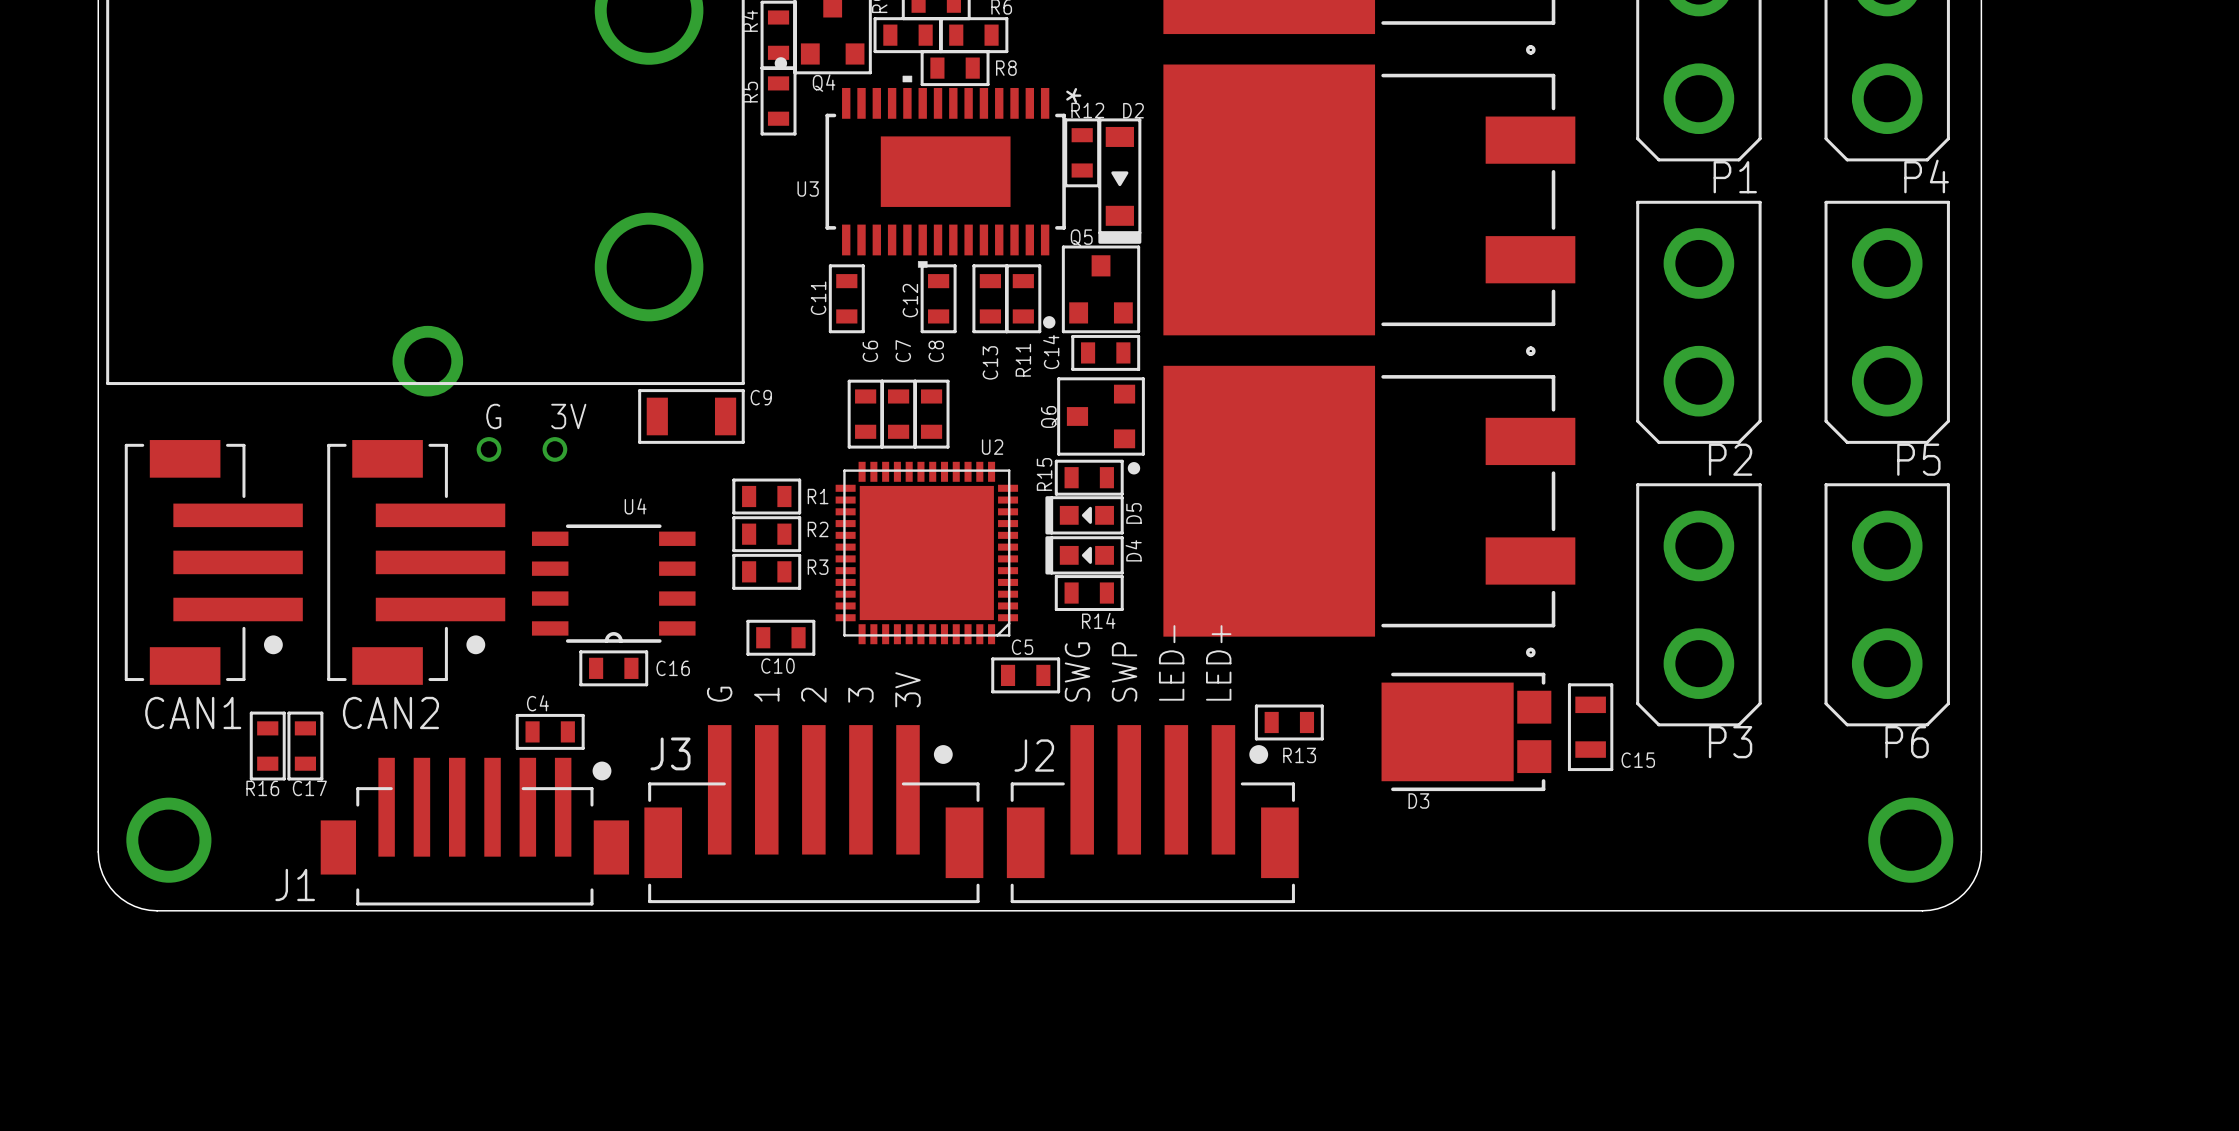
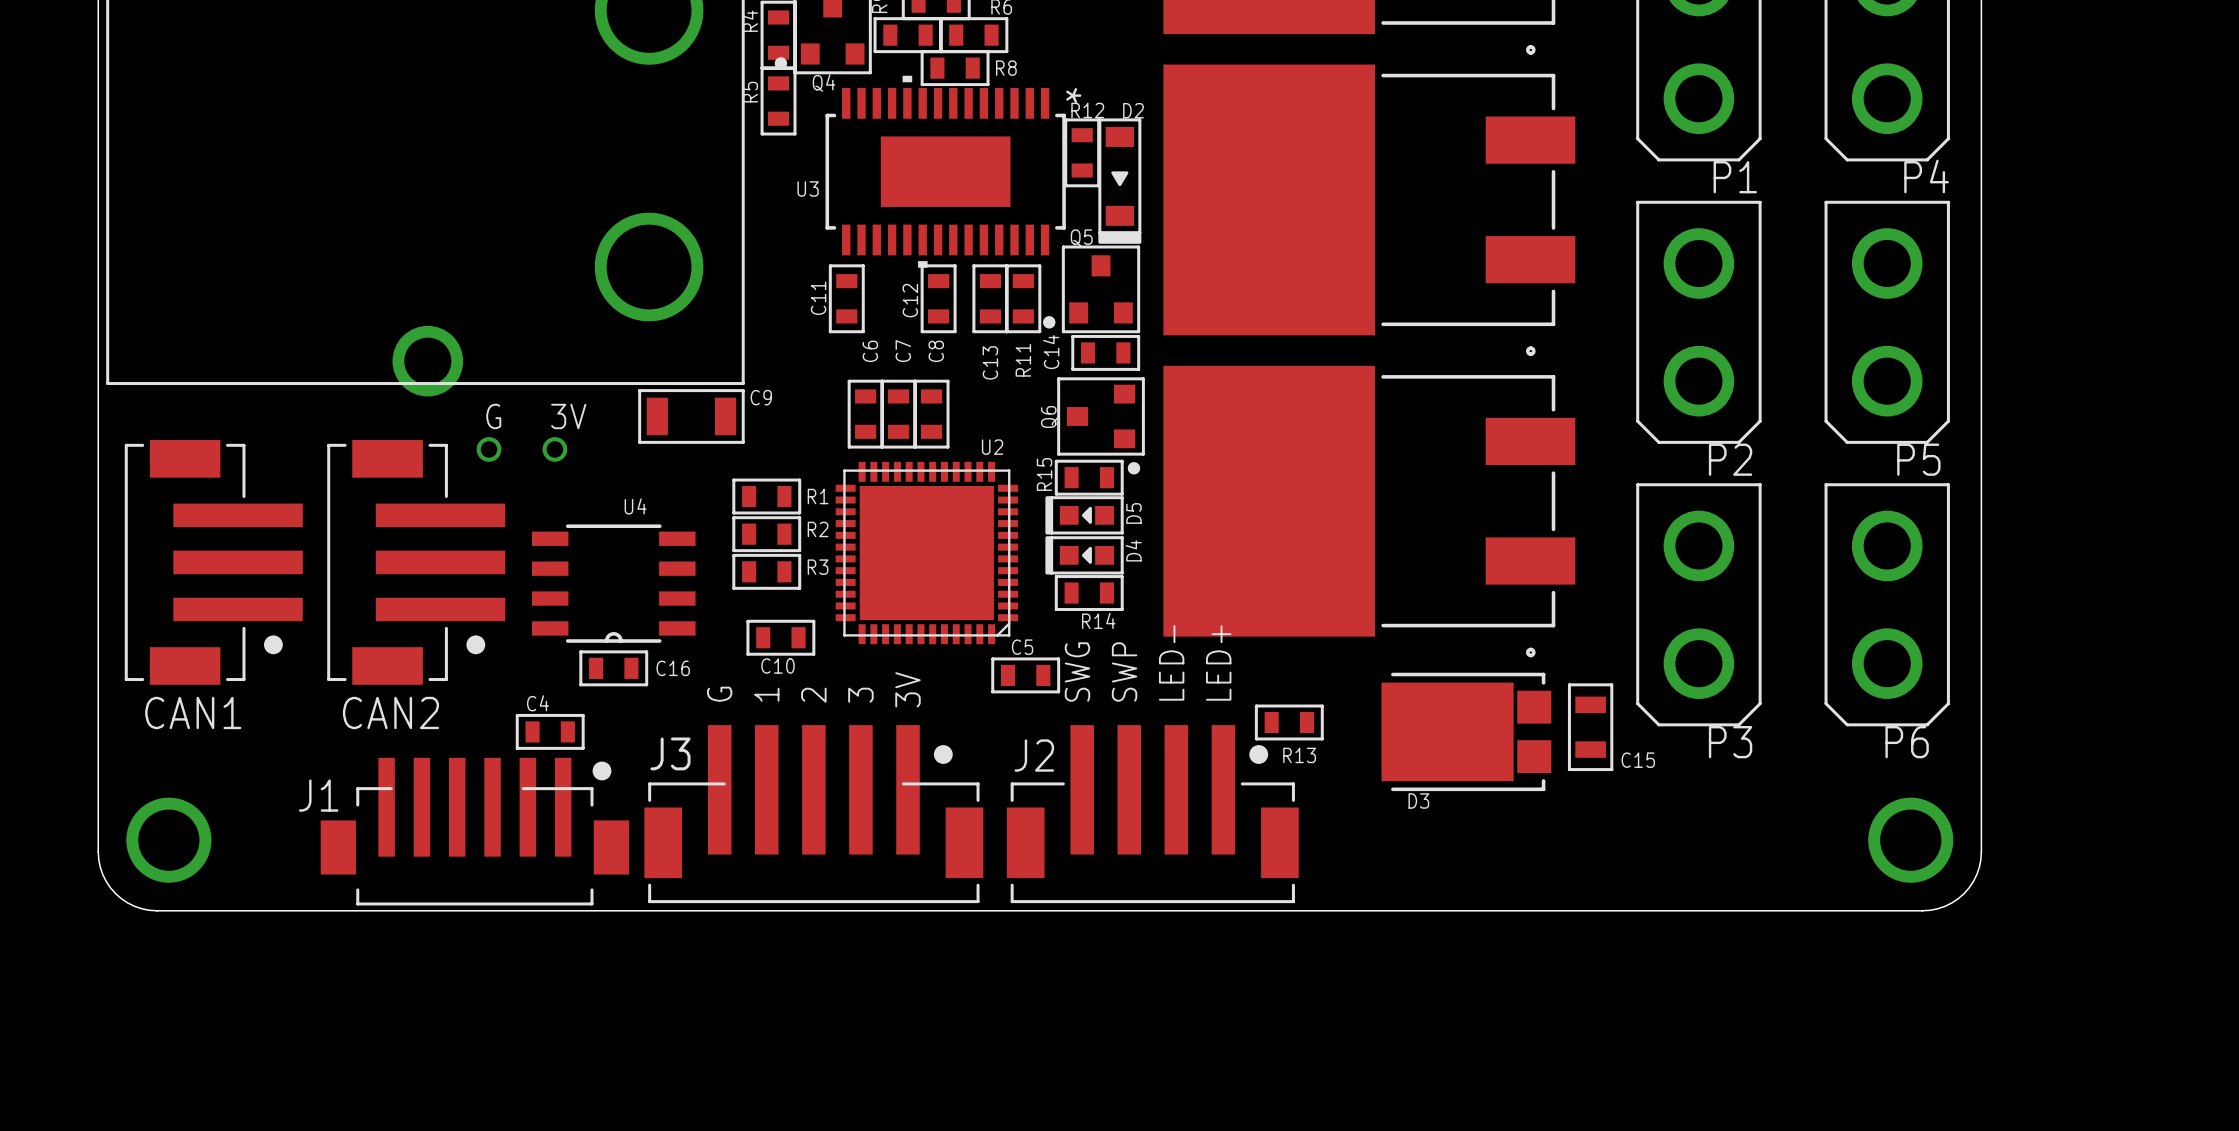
R16: (267, 746) -> none
C17: (305, 746) -> none
J1 name position: J1 (295, 884) -> J1 (318, 795)

